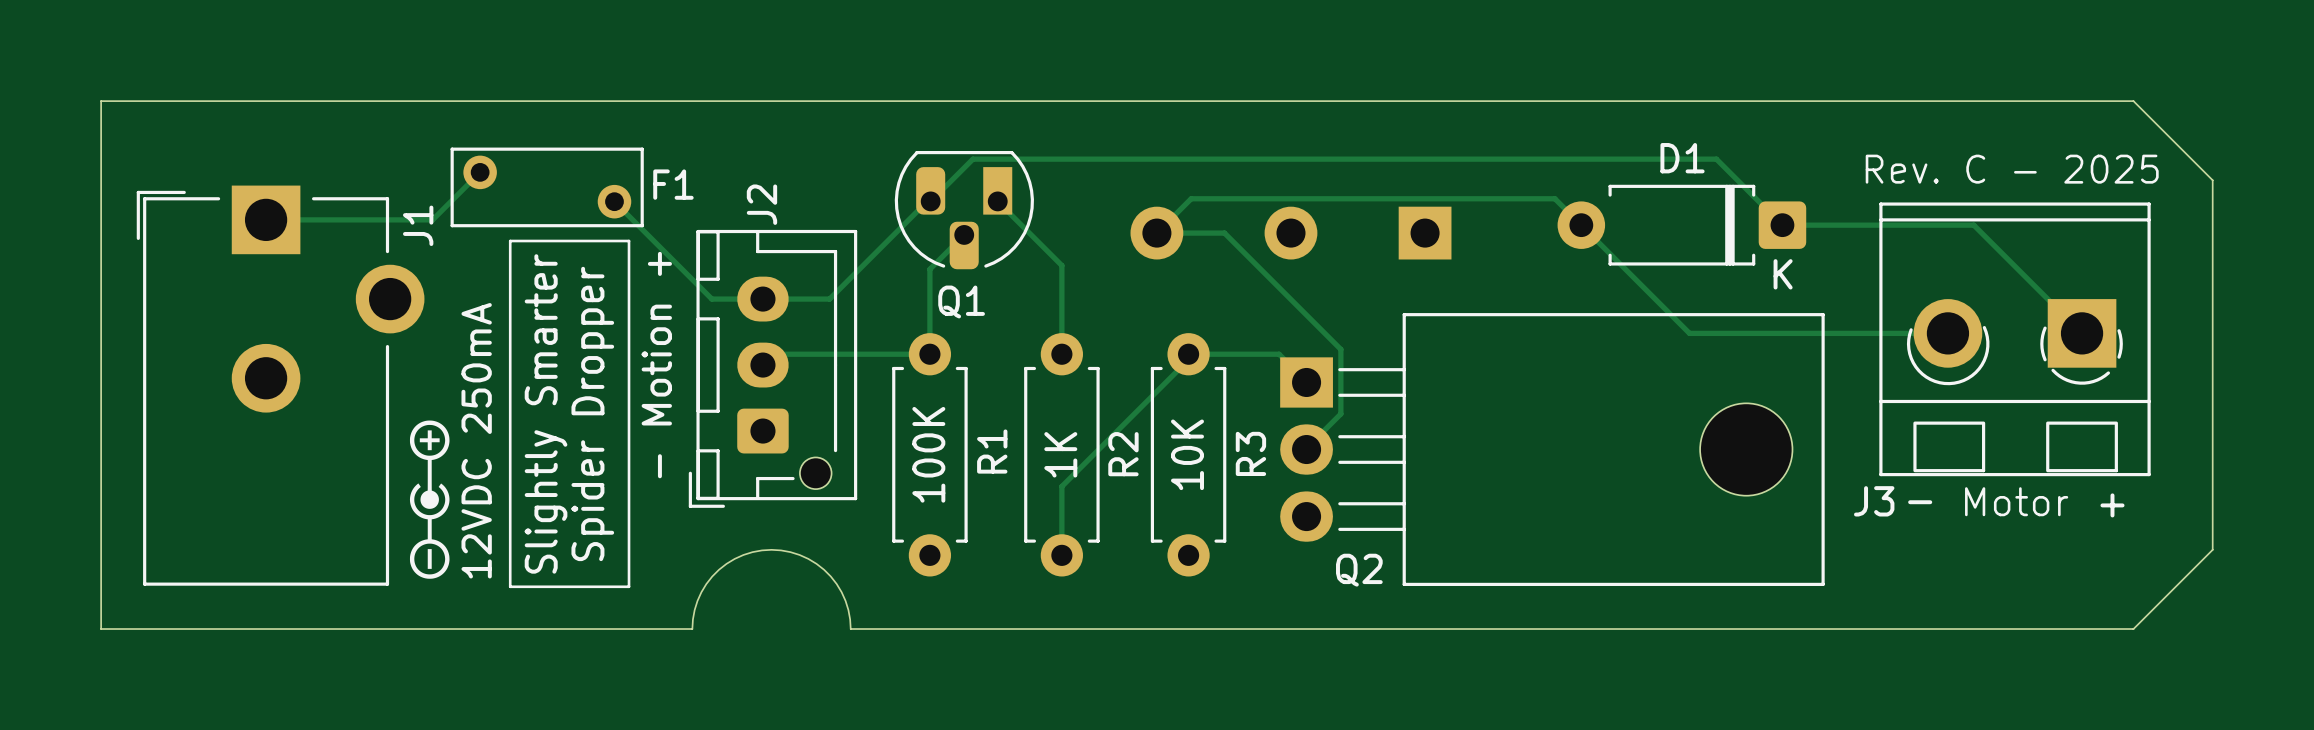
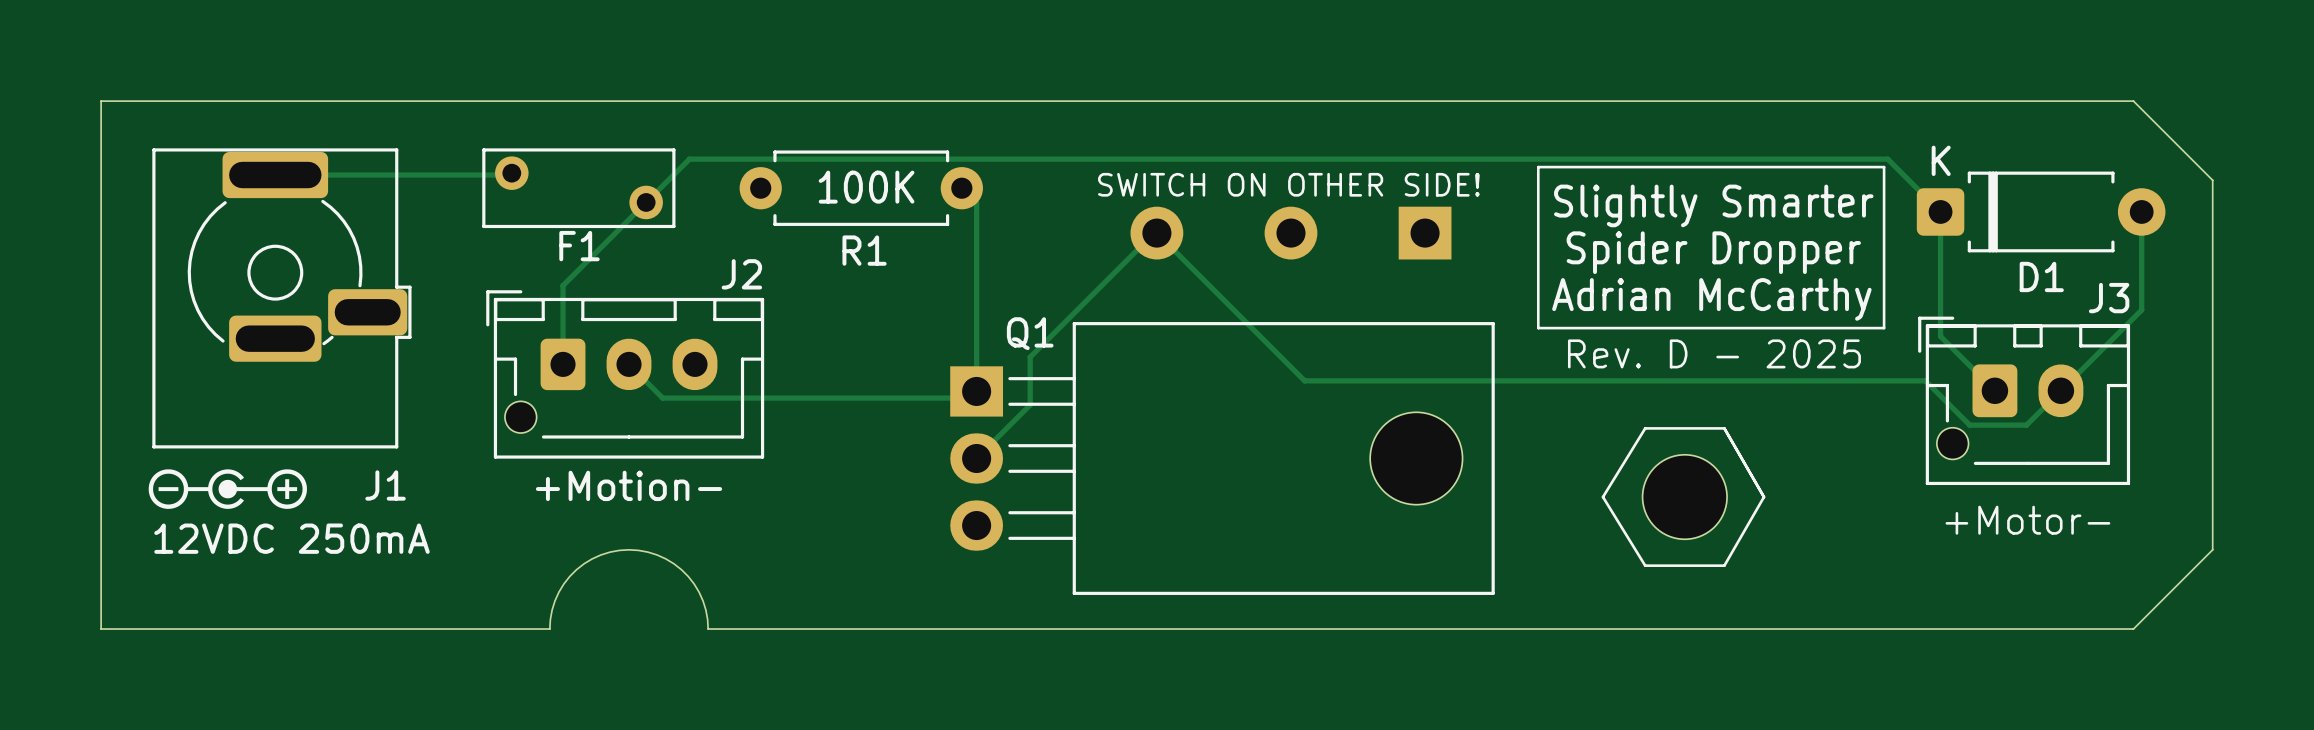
Q1 footprint: [894, 151, 1034, 270] -> [950, 322, 1495, 595]
track: (972, 159) (930, 201) -> (972, 159) (689, 159) (563, 285) (563, 364)
track: (1716, 159) (1782, 225) (1973, 225) (2082, 333) -> (1716, 159) (1887, 159) (1940, 211) (1940, 336) (1994, 390)
line: none -> (1538, 167) (1884, 167) (1884, 328) (1538, 328) (1538, 167)
text: Rev. C - 2025 (2012, 169) -> none
track: none -> (277, 172) (275, 175) (509, 175) (511, 173)
track: (480, 172) (432, 219) (266, 219) -> none
F1 name position: F1 (673, 184) -> F1 (579, 246)
text: none -> SWITCH ON OTHER SIDE! (1288, 184)
J1 footprint: [136, 185, 425, 586] -> [152, 148, 412, 449]
F1 position: (547, 187) -> (578, 188)
track: none -> (961, 188) (976, 202) (976, 391) (970, 398) (662, 398) (629, 364)
track: (930, 201) (927, 201) (829, 299) (711, 299) (614, 201) -> none
track: (997, 201) (1061, 265) (1061, 354) -> none
J3 footprint: [1879, 202, 2151, 477] -> [1918, 316, 2131, 486]
J2 name position: J2 (761, 204) -> J2 (741, 274)
text: none -> Slightly Smarter (1713, 205)
track: none -> (2141, 211) (2141, 310) (2026, 425) (1969, 425) (1925, 380) (1304, 380) (1156, 233)
J1 name position: J1 (418, 225) -> J1 (385, 485)
D1 rotation: 0° (1681, 225) -> 180° (2041, 211)
D1 position: (1681, 225) -> (2041, 211)
track: none -> (1154, 233) (1030, 357) (1030, 404) (976, 458)
track: (964, 234) (929, 269) (929, 354) (774, 354) (762, 365) -> none
line: (510, 241) (629, 241) (629, 586) (510, 586) (510, 241) -> none
text: none -> Spider Dropper (1713, 252)
text: none -> Adrian McCarthy (1711, 299)
Q1 name position: Q1 (961, 301) -> Q1 (1030, 333)
track: (1947, 333) (1689, 333) (1554, 198) (1191, 198) (1156, 233) (1224, 233) (1340, 349) (1340, 413) (1306, 449) -> none
text: none -> Rev. D - 2025 (1714, 353)
text: - Motion + (656, 365) -> +Motion- (629, 485)
J2 rotation: 0° (772, 368) -> 90° clockwise (625, 374)
track: (1306, 382) (1279, 354) (1188, 354) (1188, 359) (1061, 486) (1061, 555) -> none
text: Slightly Smarter (546, 413) -> none
text: Spider Dropper (592, 413) -> none
drawing: [409, 420, 450, 579] -> none
line: none -> (1645, 428) (1724, 428) (1763, 497) (1724, 565) (1645, 565) (1602, 497) (1645, 428)
text rotation: 0° (476, 440) -> 90° clockwise (292, 538)
Q2: (1552, 449) -> none
text rotation: 0° (928, 454) -> 90° clockwise (866, 187)
text position: 100K (928, 454) -> 100K (866, 187)
R1 rotation: 0° (929, 454) -> 90° clockwise (861, 188)
R1 position: (929, 454) -> (861, 188)
text: 1K (1060, 454) -> none
R2: (1061, 454) -> none
text: 10K (1187, 454) -> none
R3: (1188, 454) -> none
drawing: none -> [148, 469, 307, 509]
part: none -> (1684, 497)
J3 name position: J3 (1874, 501) -> J3 (2109, 298)
text: Motor (2016, 501) -> +Motor- (2027, 520)
text: - (1920, 502) -> none
text: + (2112, 505) -> none
board edge: (549, 629) (692, 629) (697, 600) (706, 584) (719, 569) (743, 554) (771, 549) (799, 554) (824, 569) (841, 592) (848, 610) (850, 629) -> (549, 629) (554, 600) (569, 576) (584, 563) (600, 554) (629, 549) (657, 554) (681, 569) (699, 592) (705, 610) (708, 629) (850, 629)

